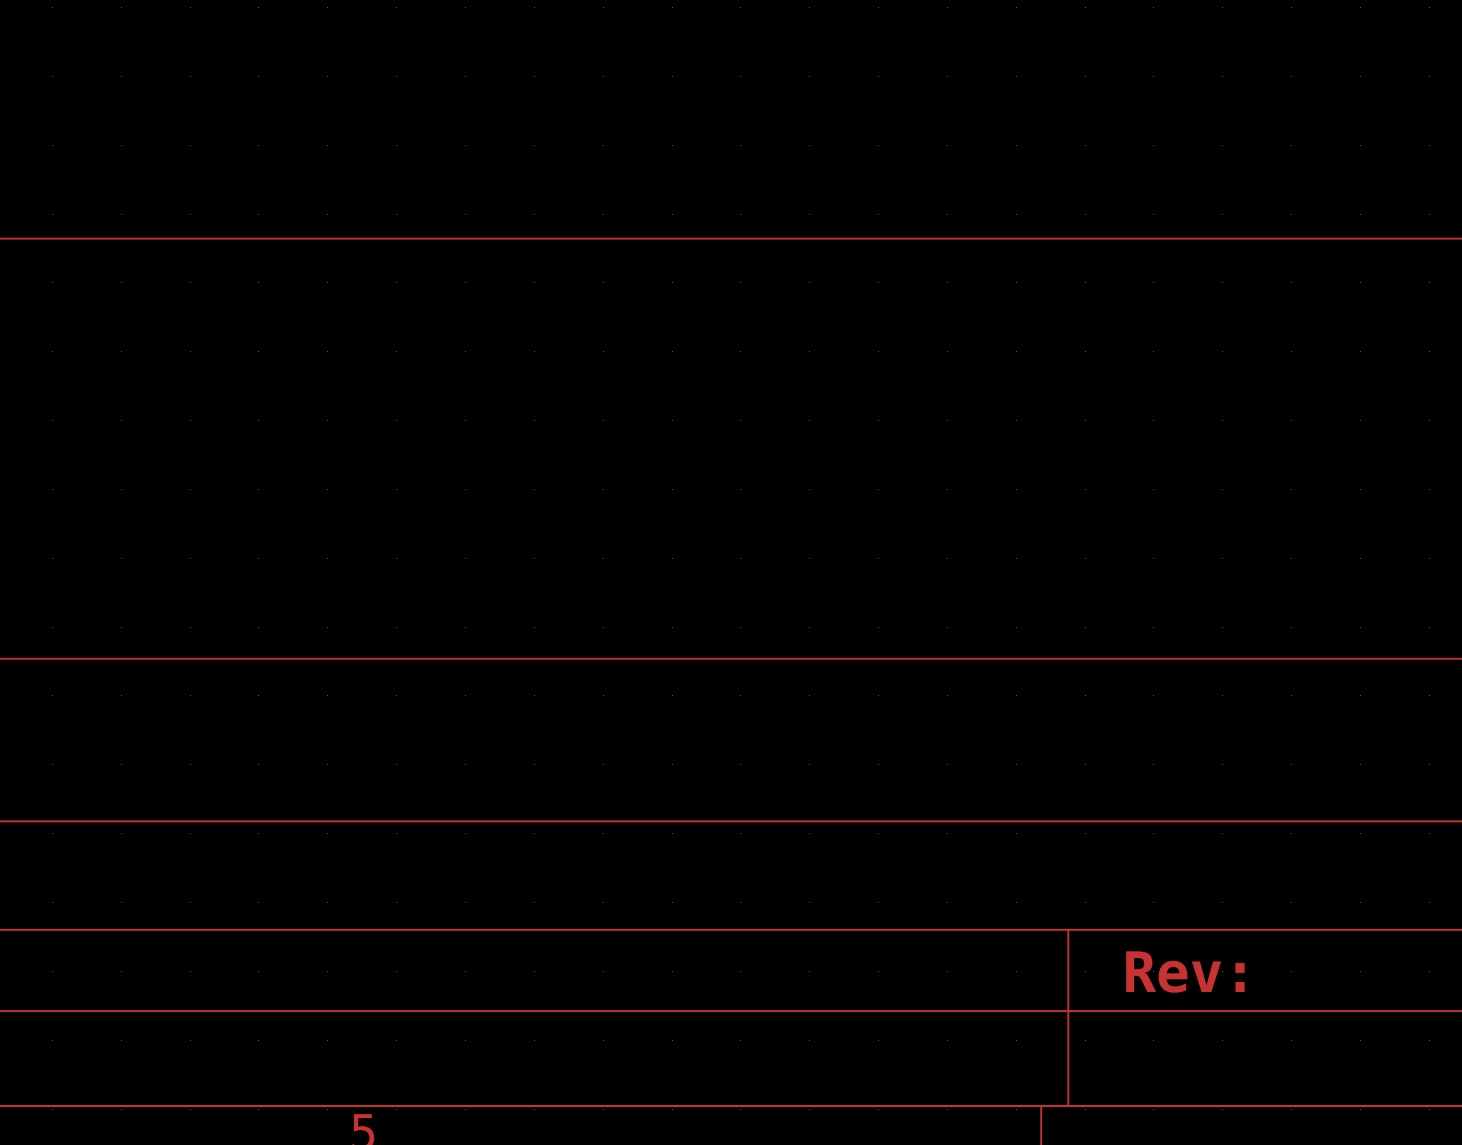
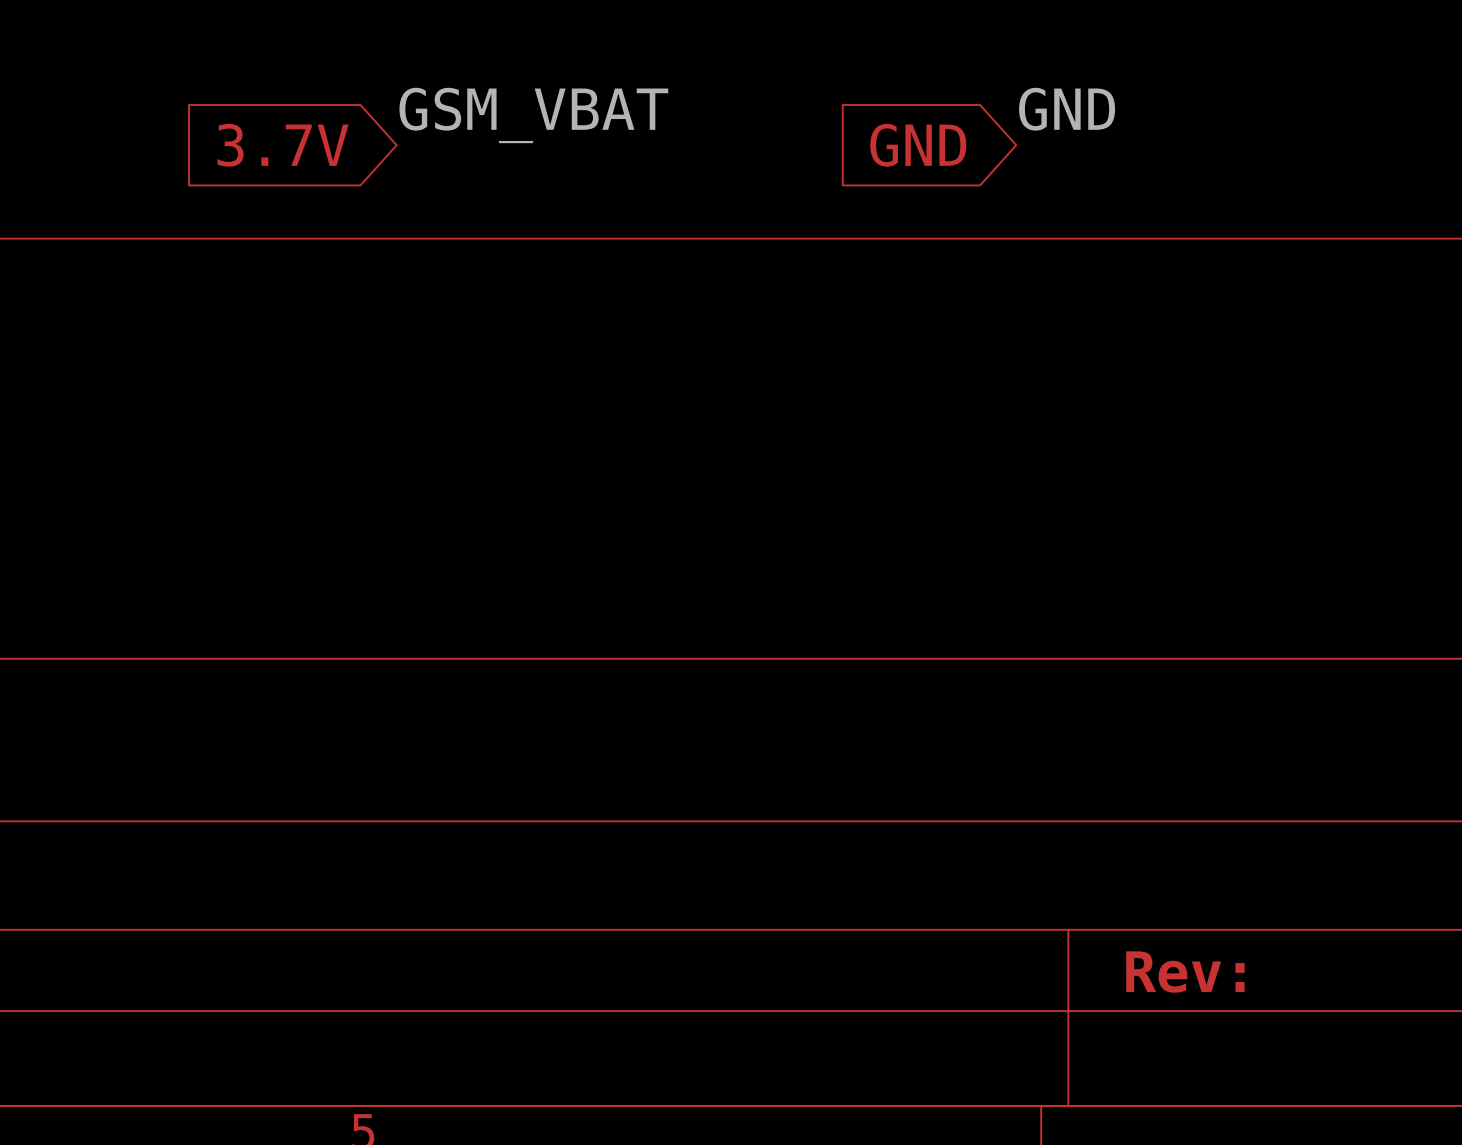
label: none -> GND (1067, 109)
label: none -> GSM_VBAT (533, 115)
global label: none -> 3.7V (283, 145)
global label: none -> GND (918, 145)

